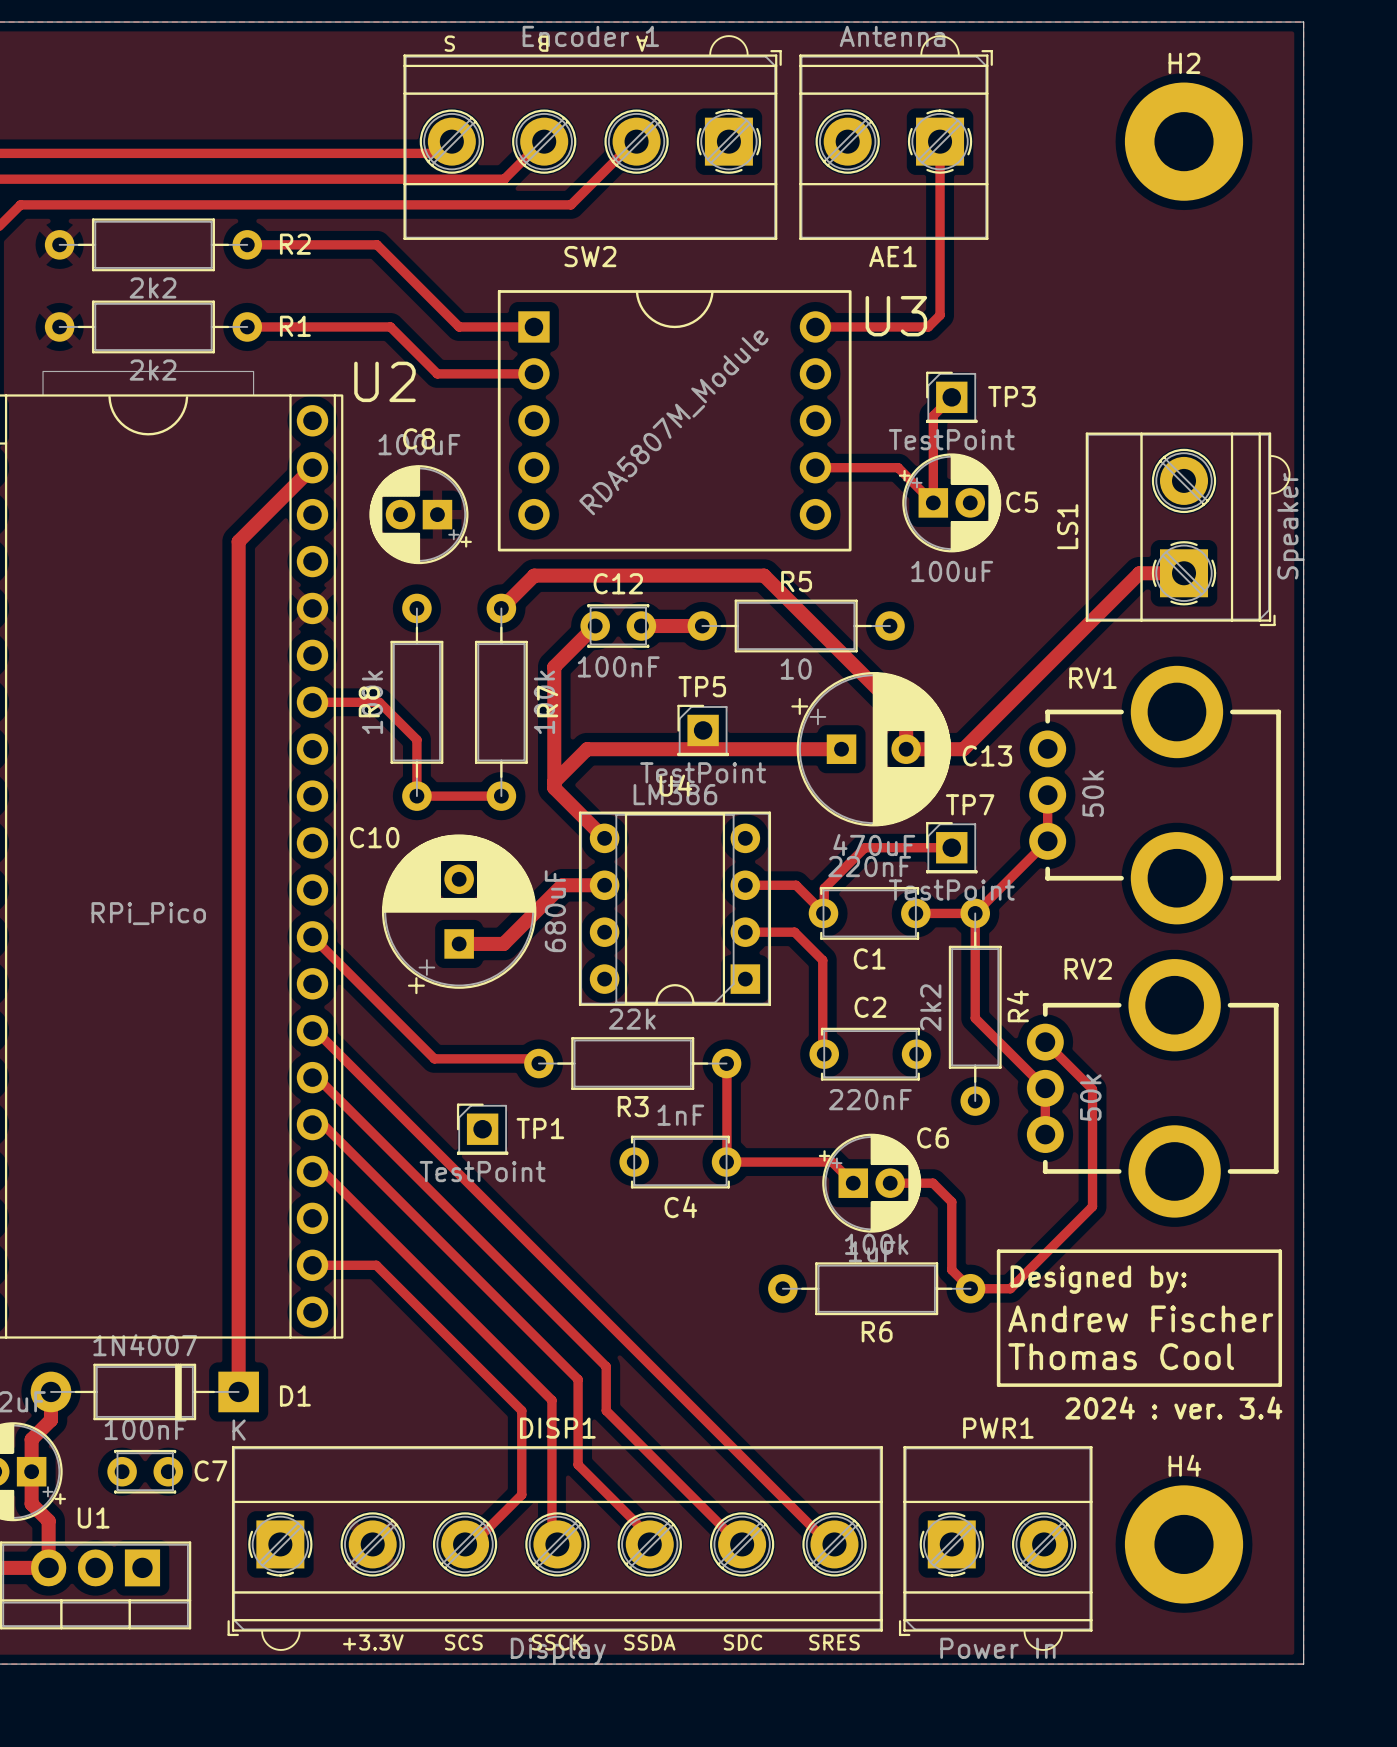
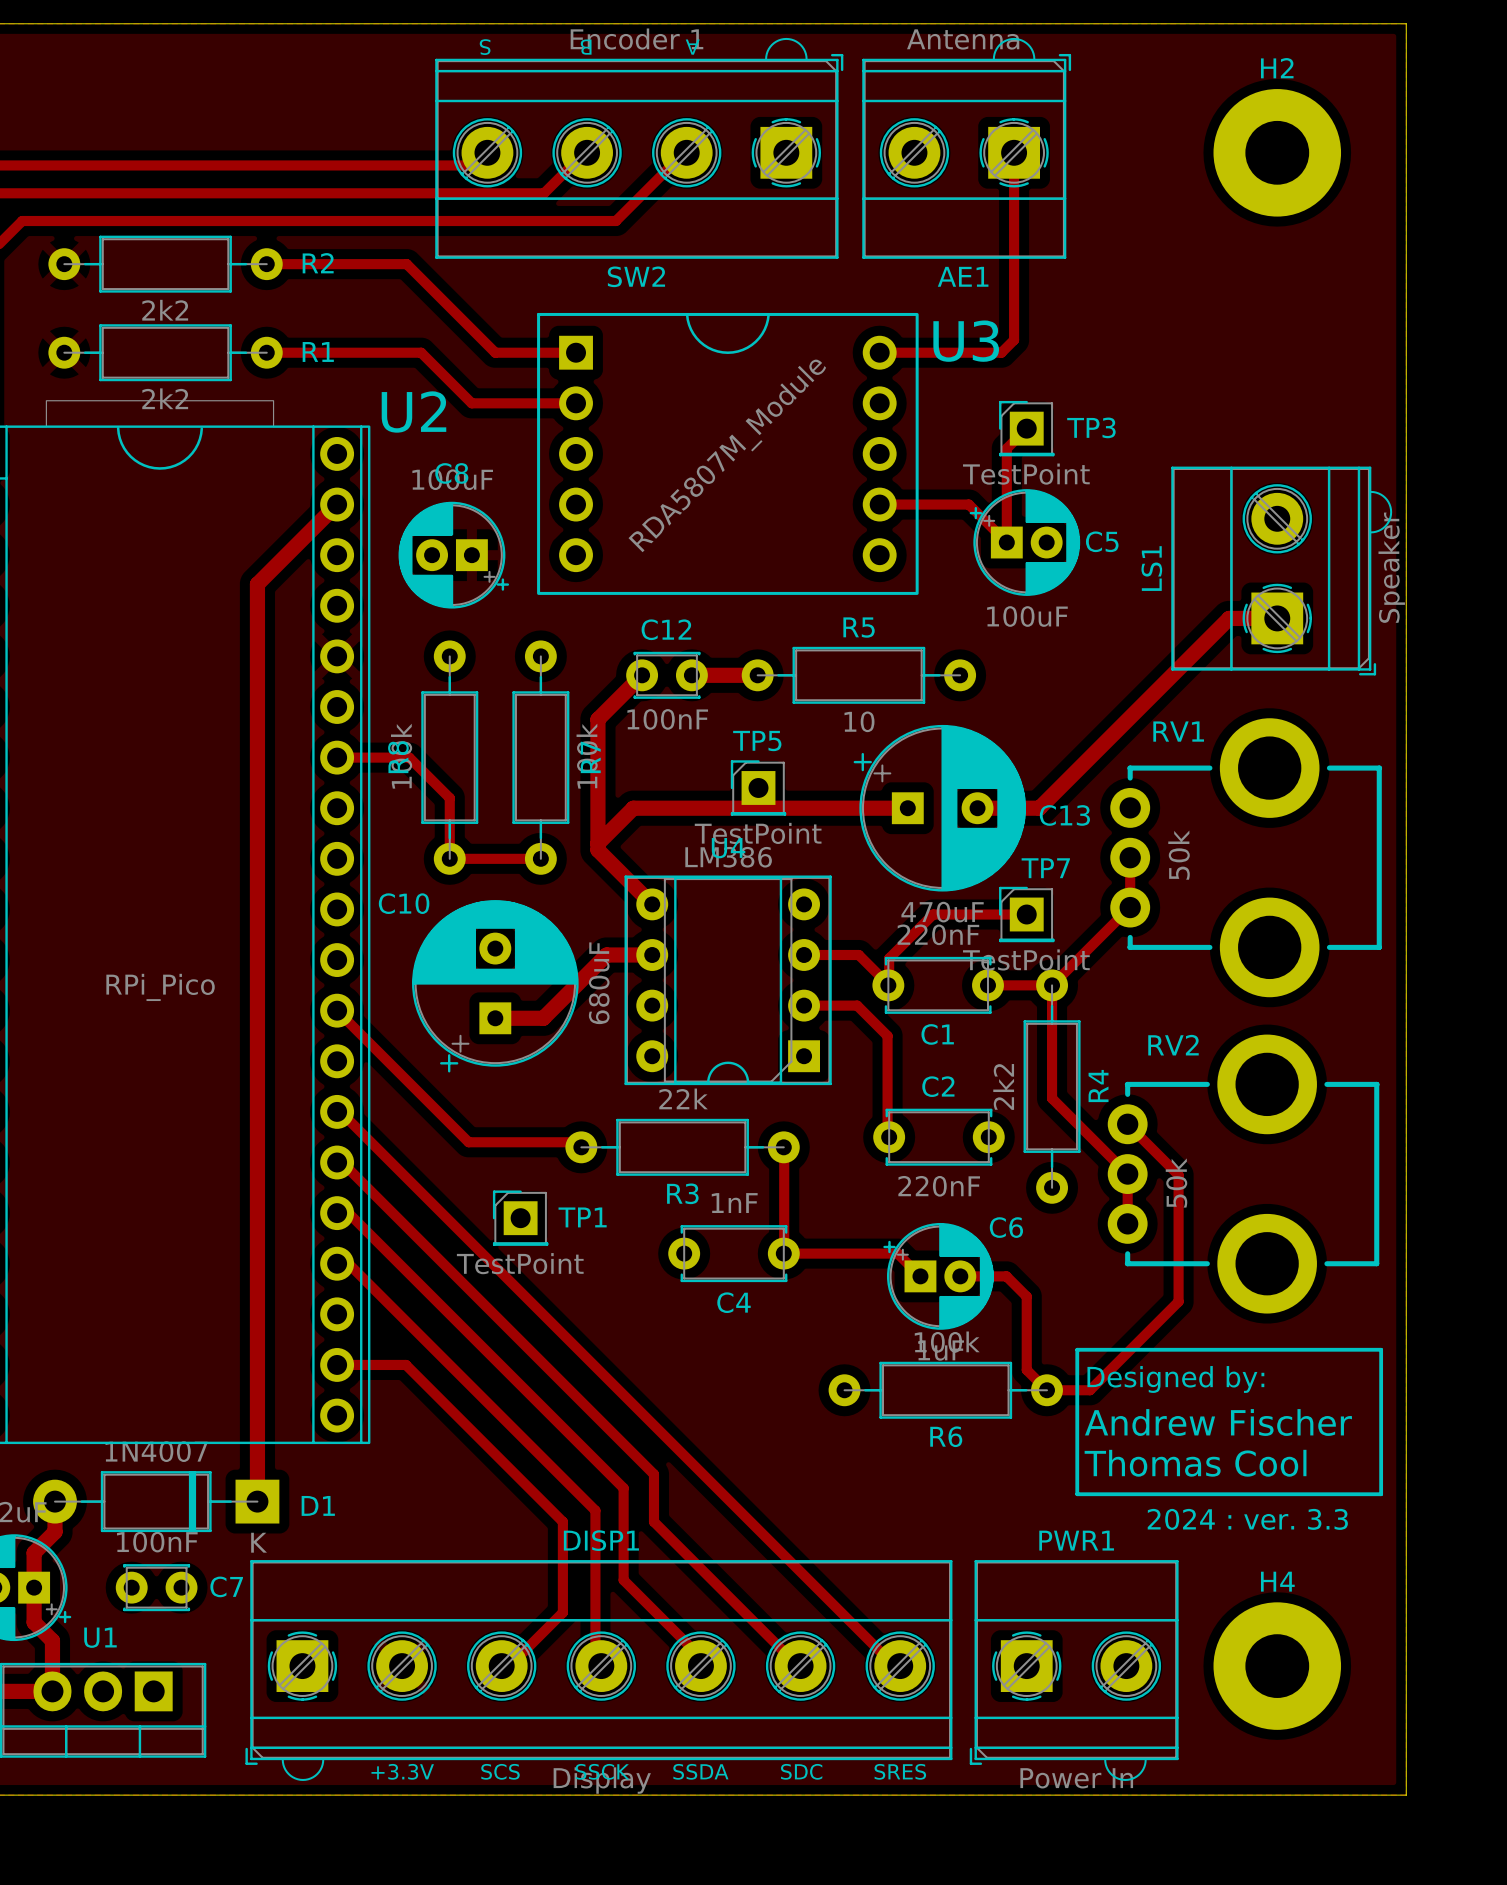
track: (501, 608) (534, 575) (764, 575) (906, 717) (906, 749) -> none
text: 2024 : ver. 3.4 (1173, 1407) -> 2024 : ver. 3.3 (1247, 1519)

